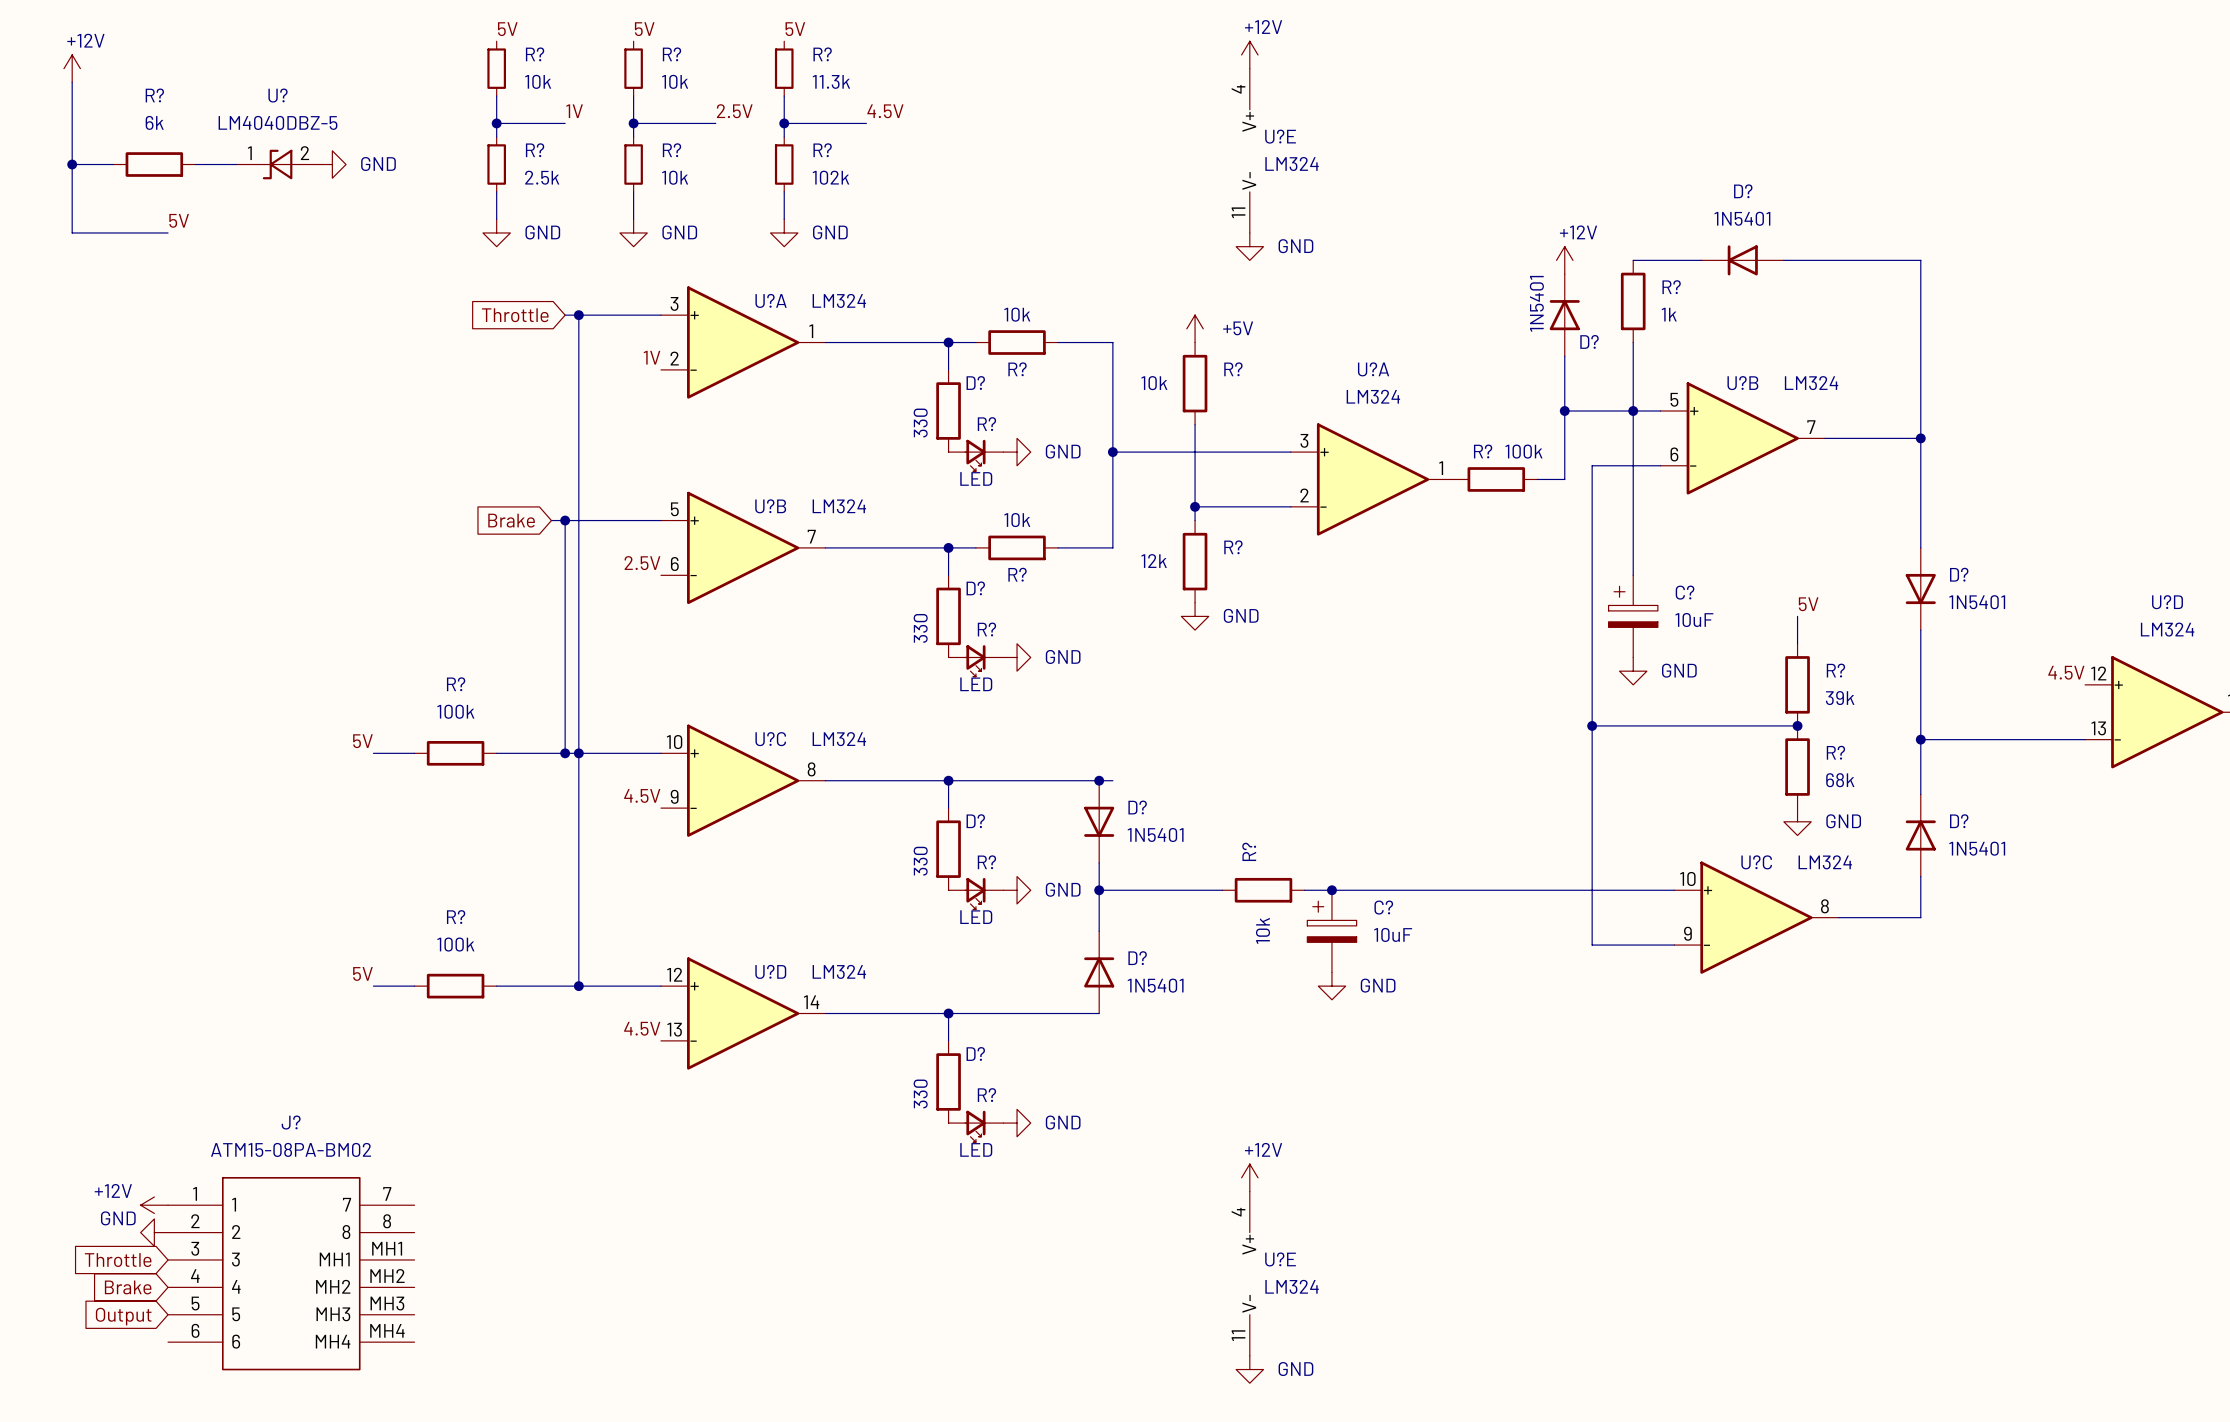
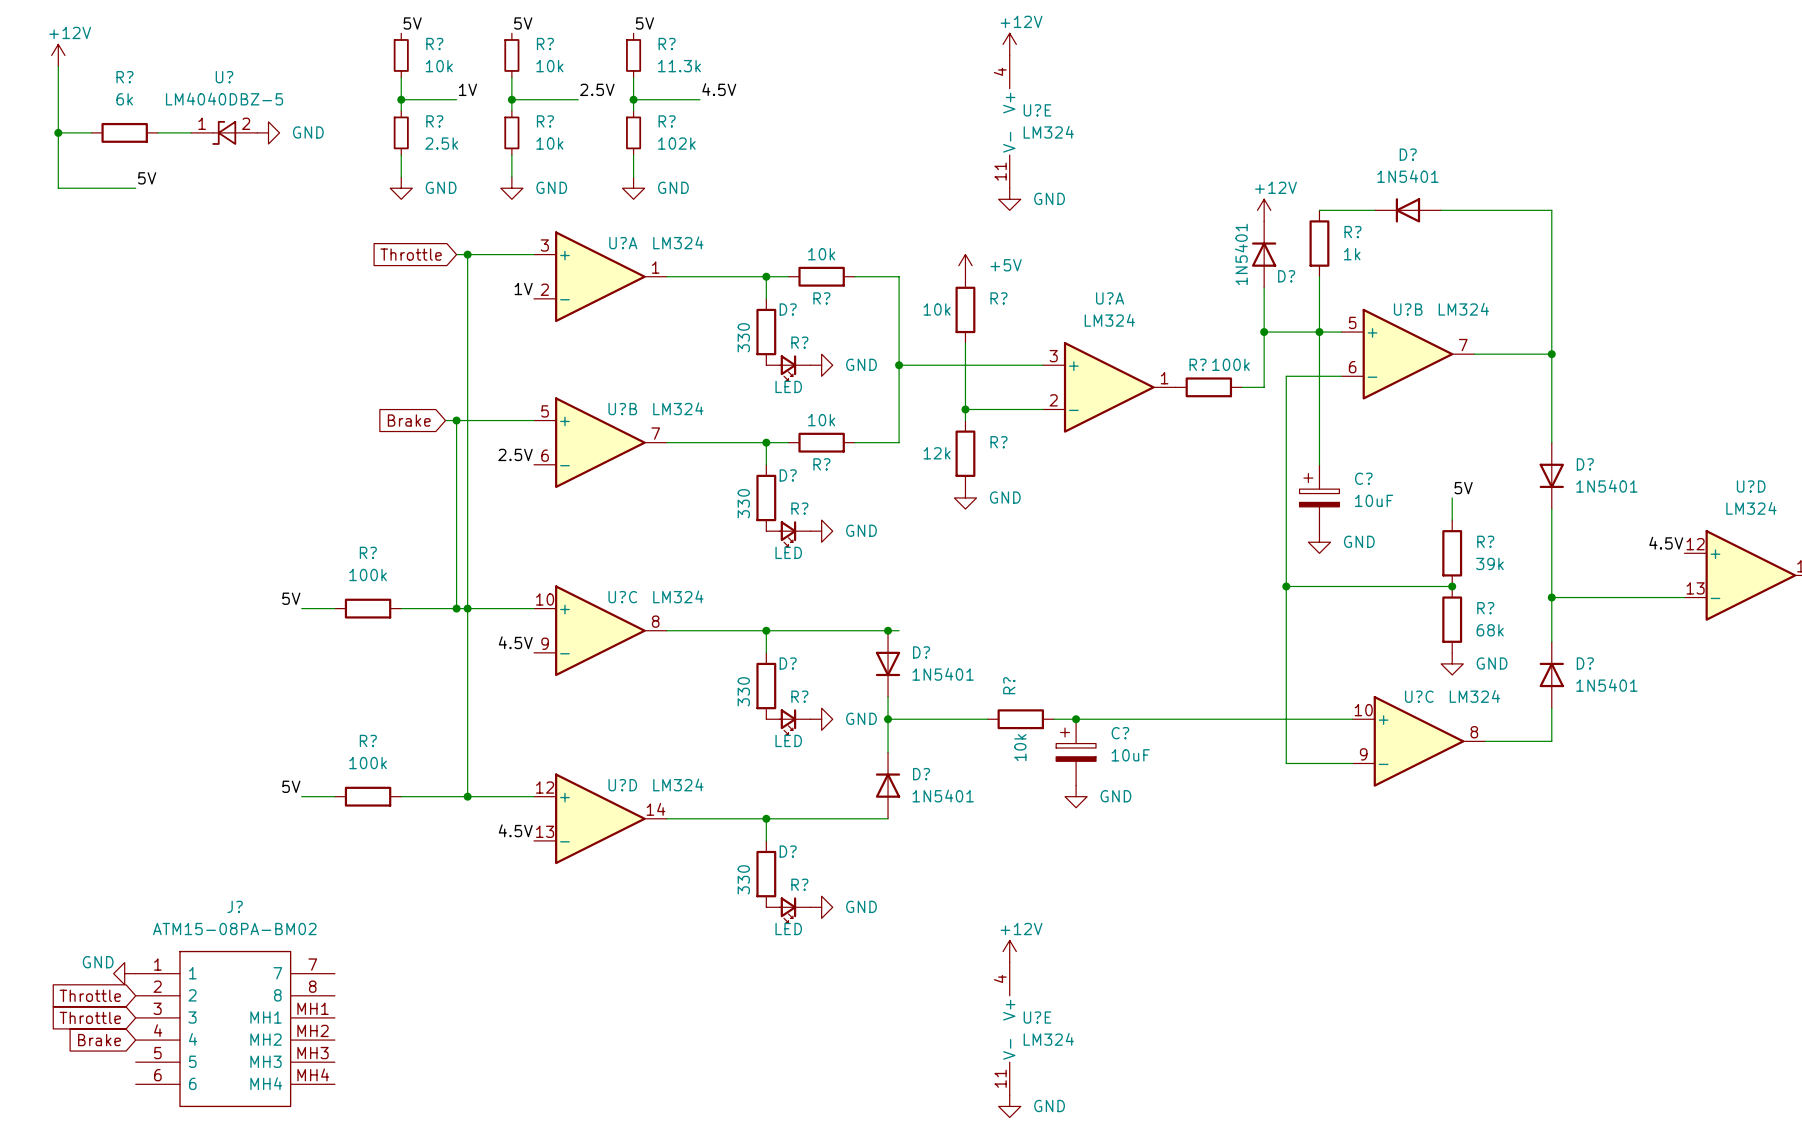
power symbol: +12V (154, 1205) -> GND (124, 973)
global label: none -> Throttle (90, 995)
power symbol: GND (154, 1232) -> none
global label: Output (123, 1316) -> none

